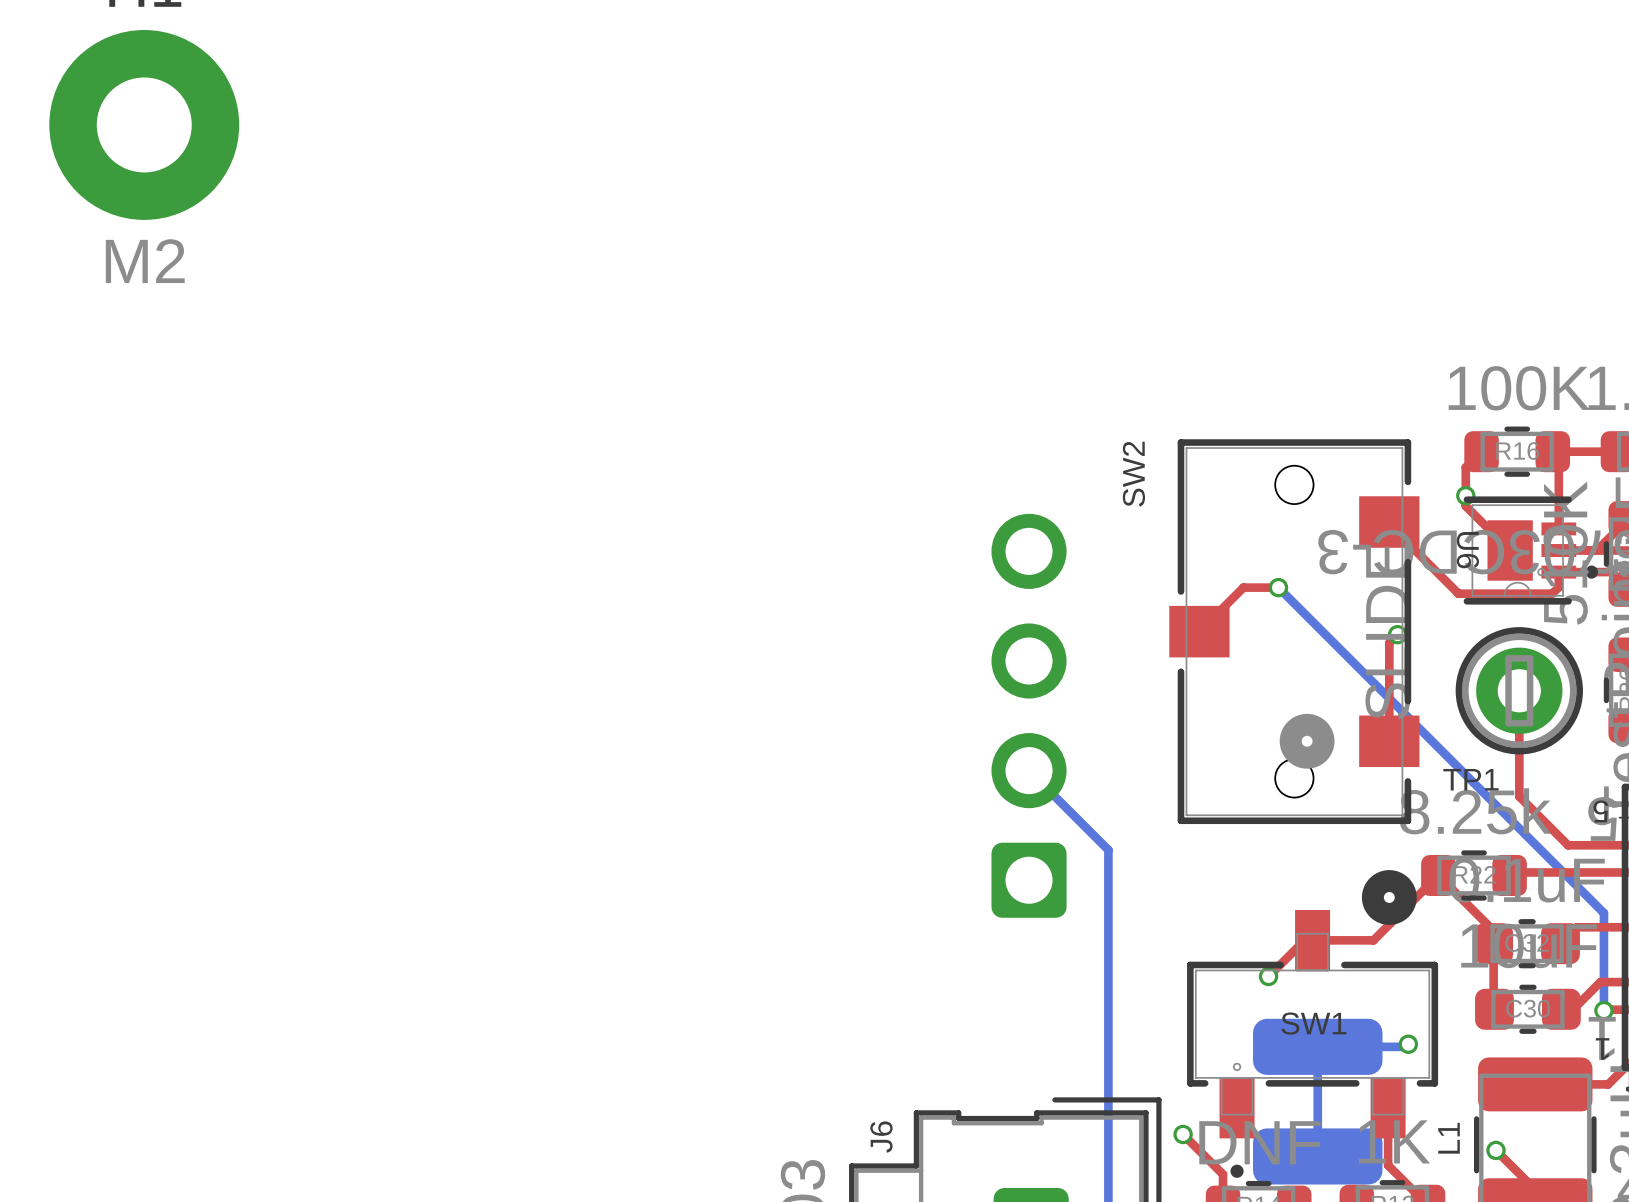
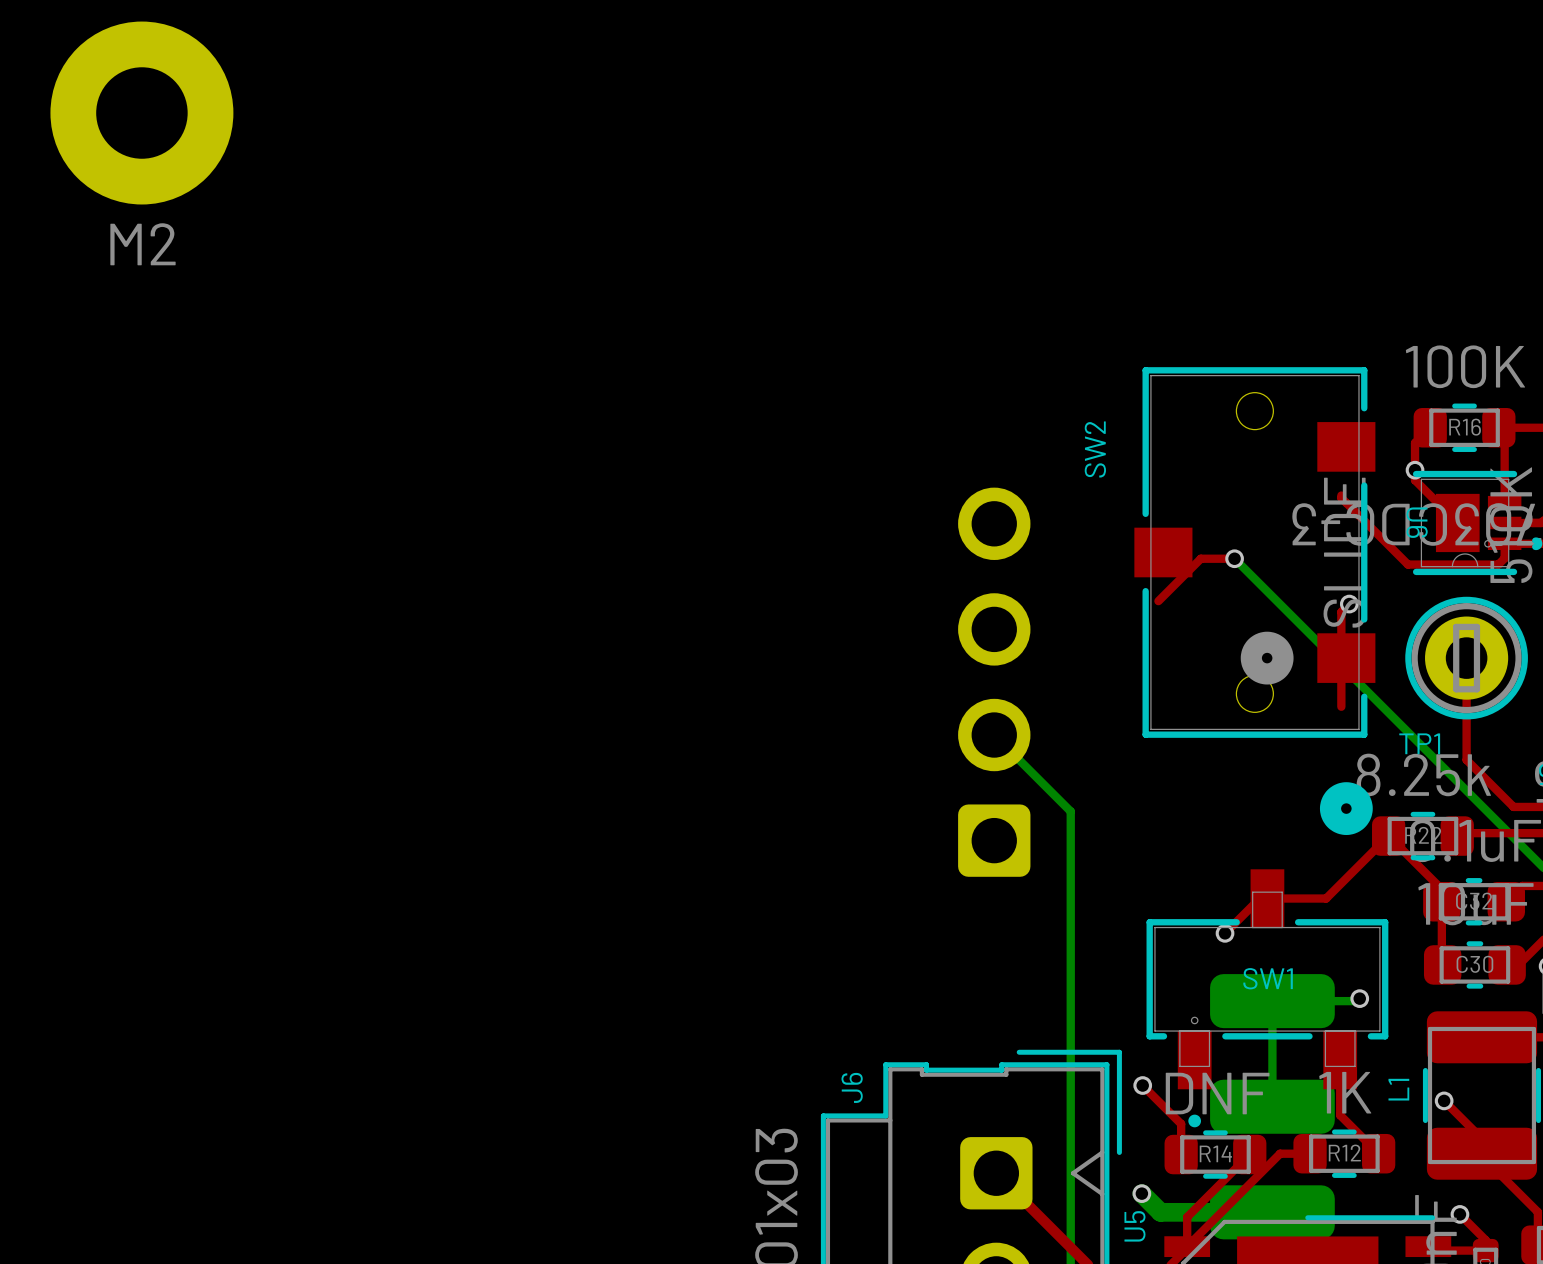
SW2 position: (1294, 682) -> (1254, 601)

